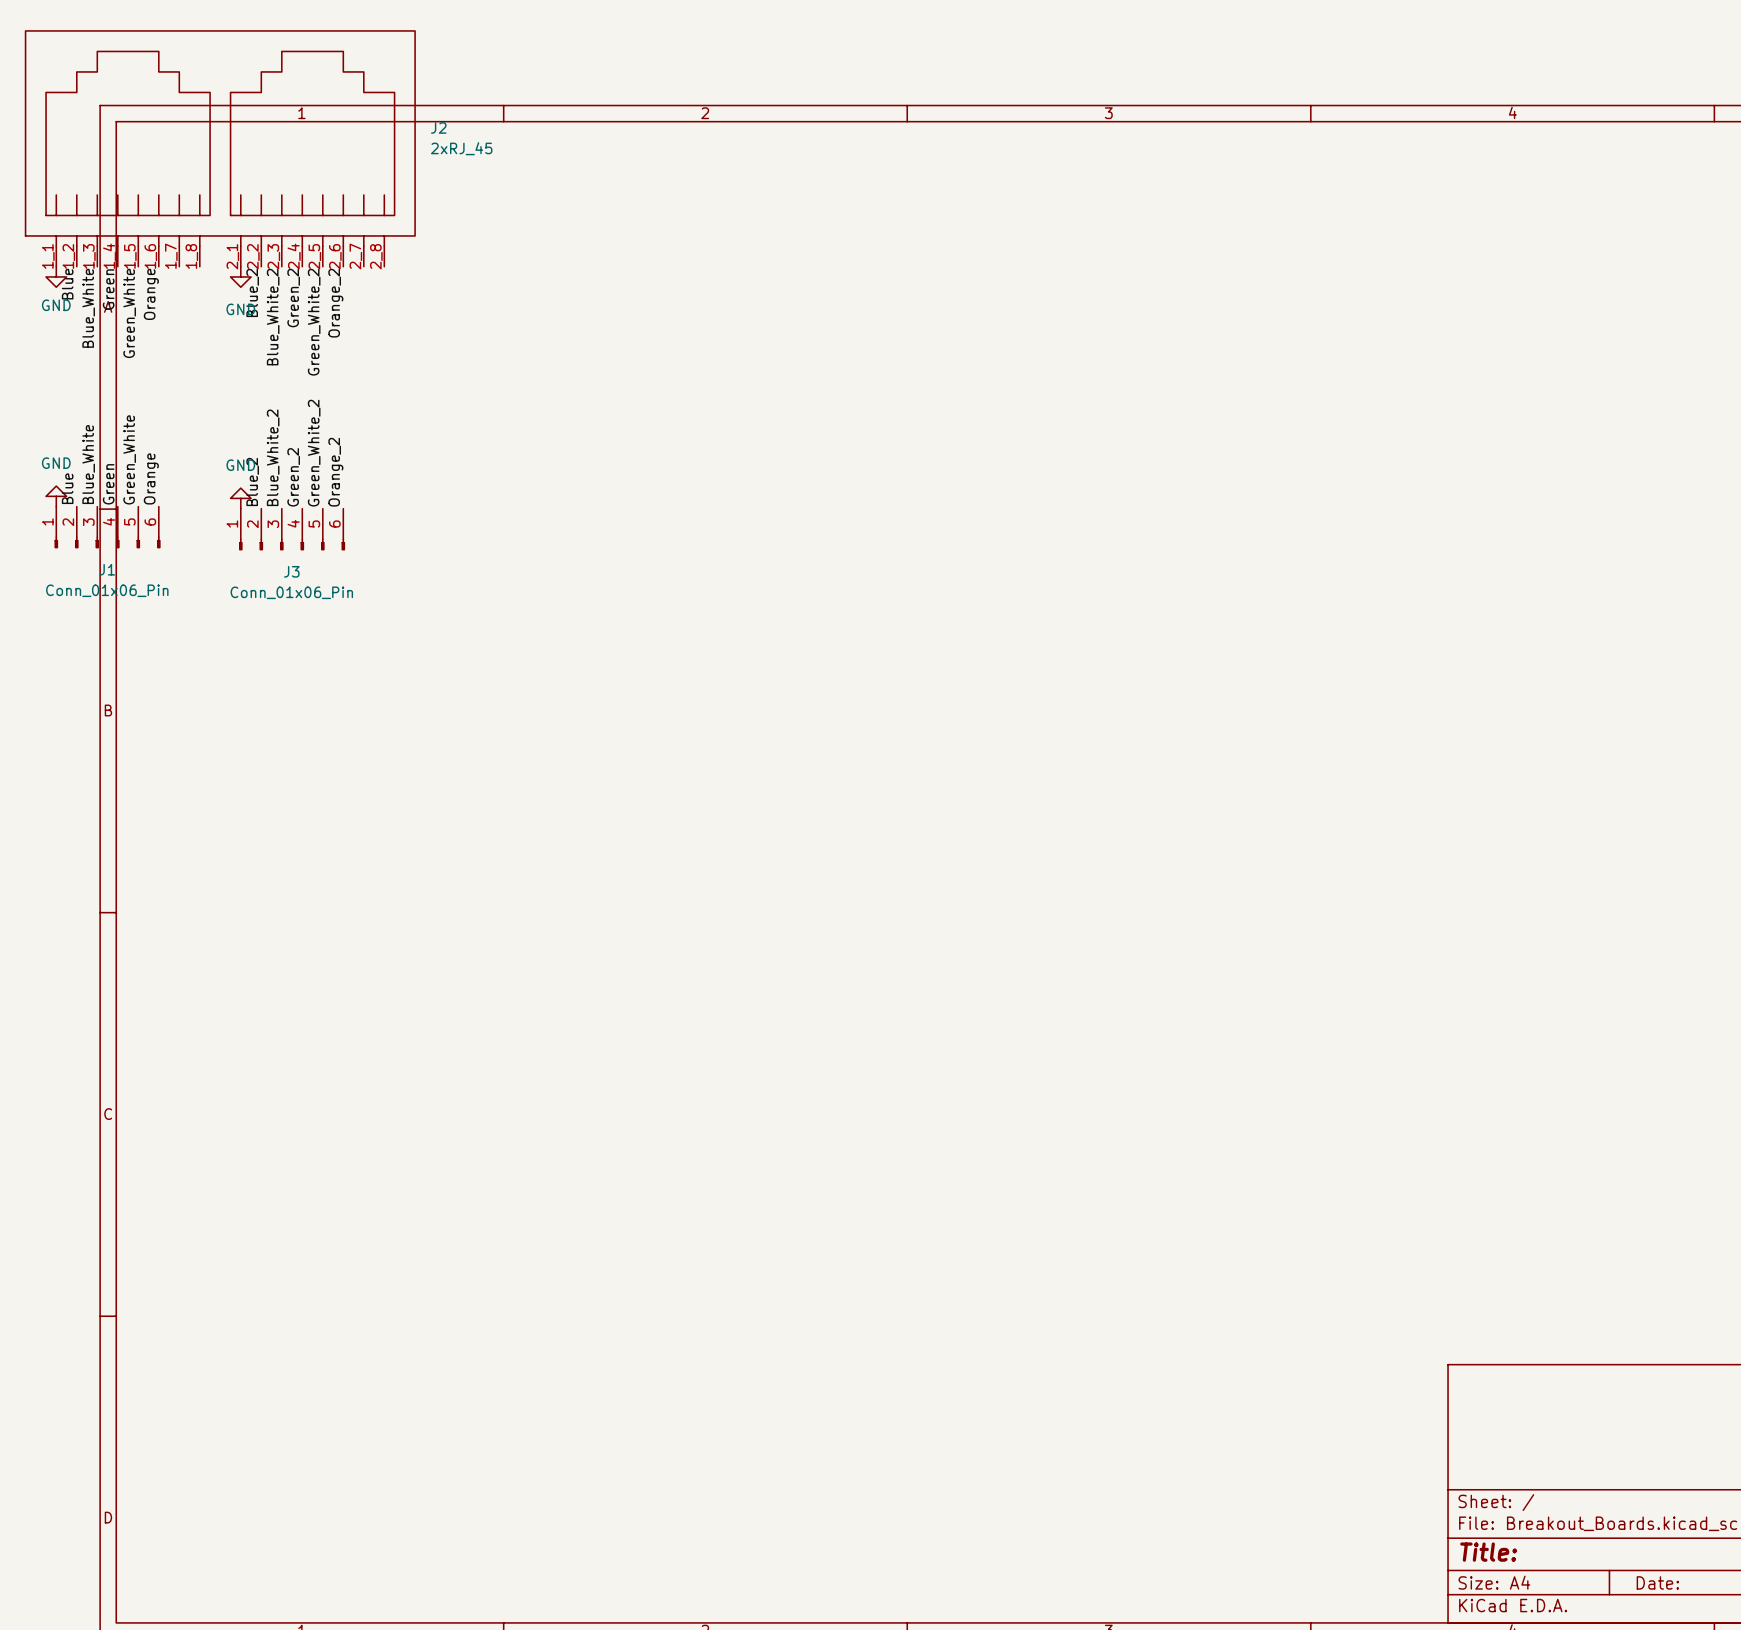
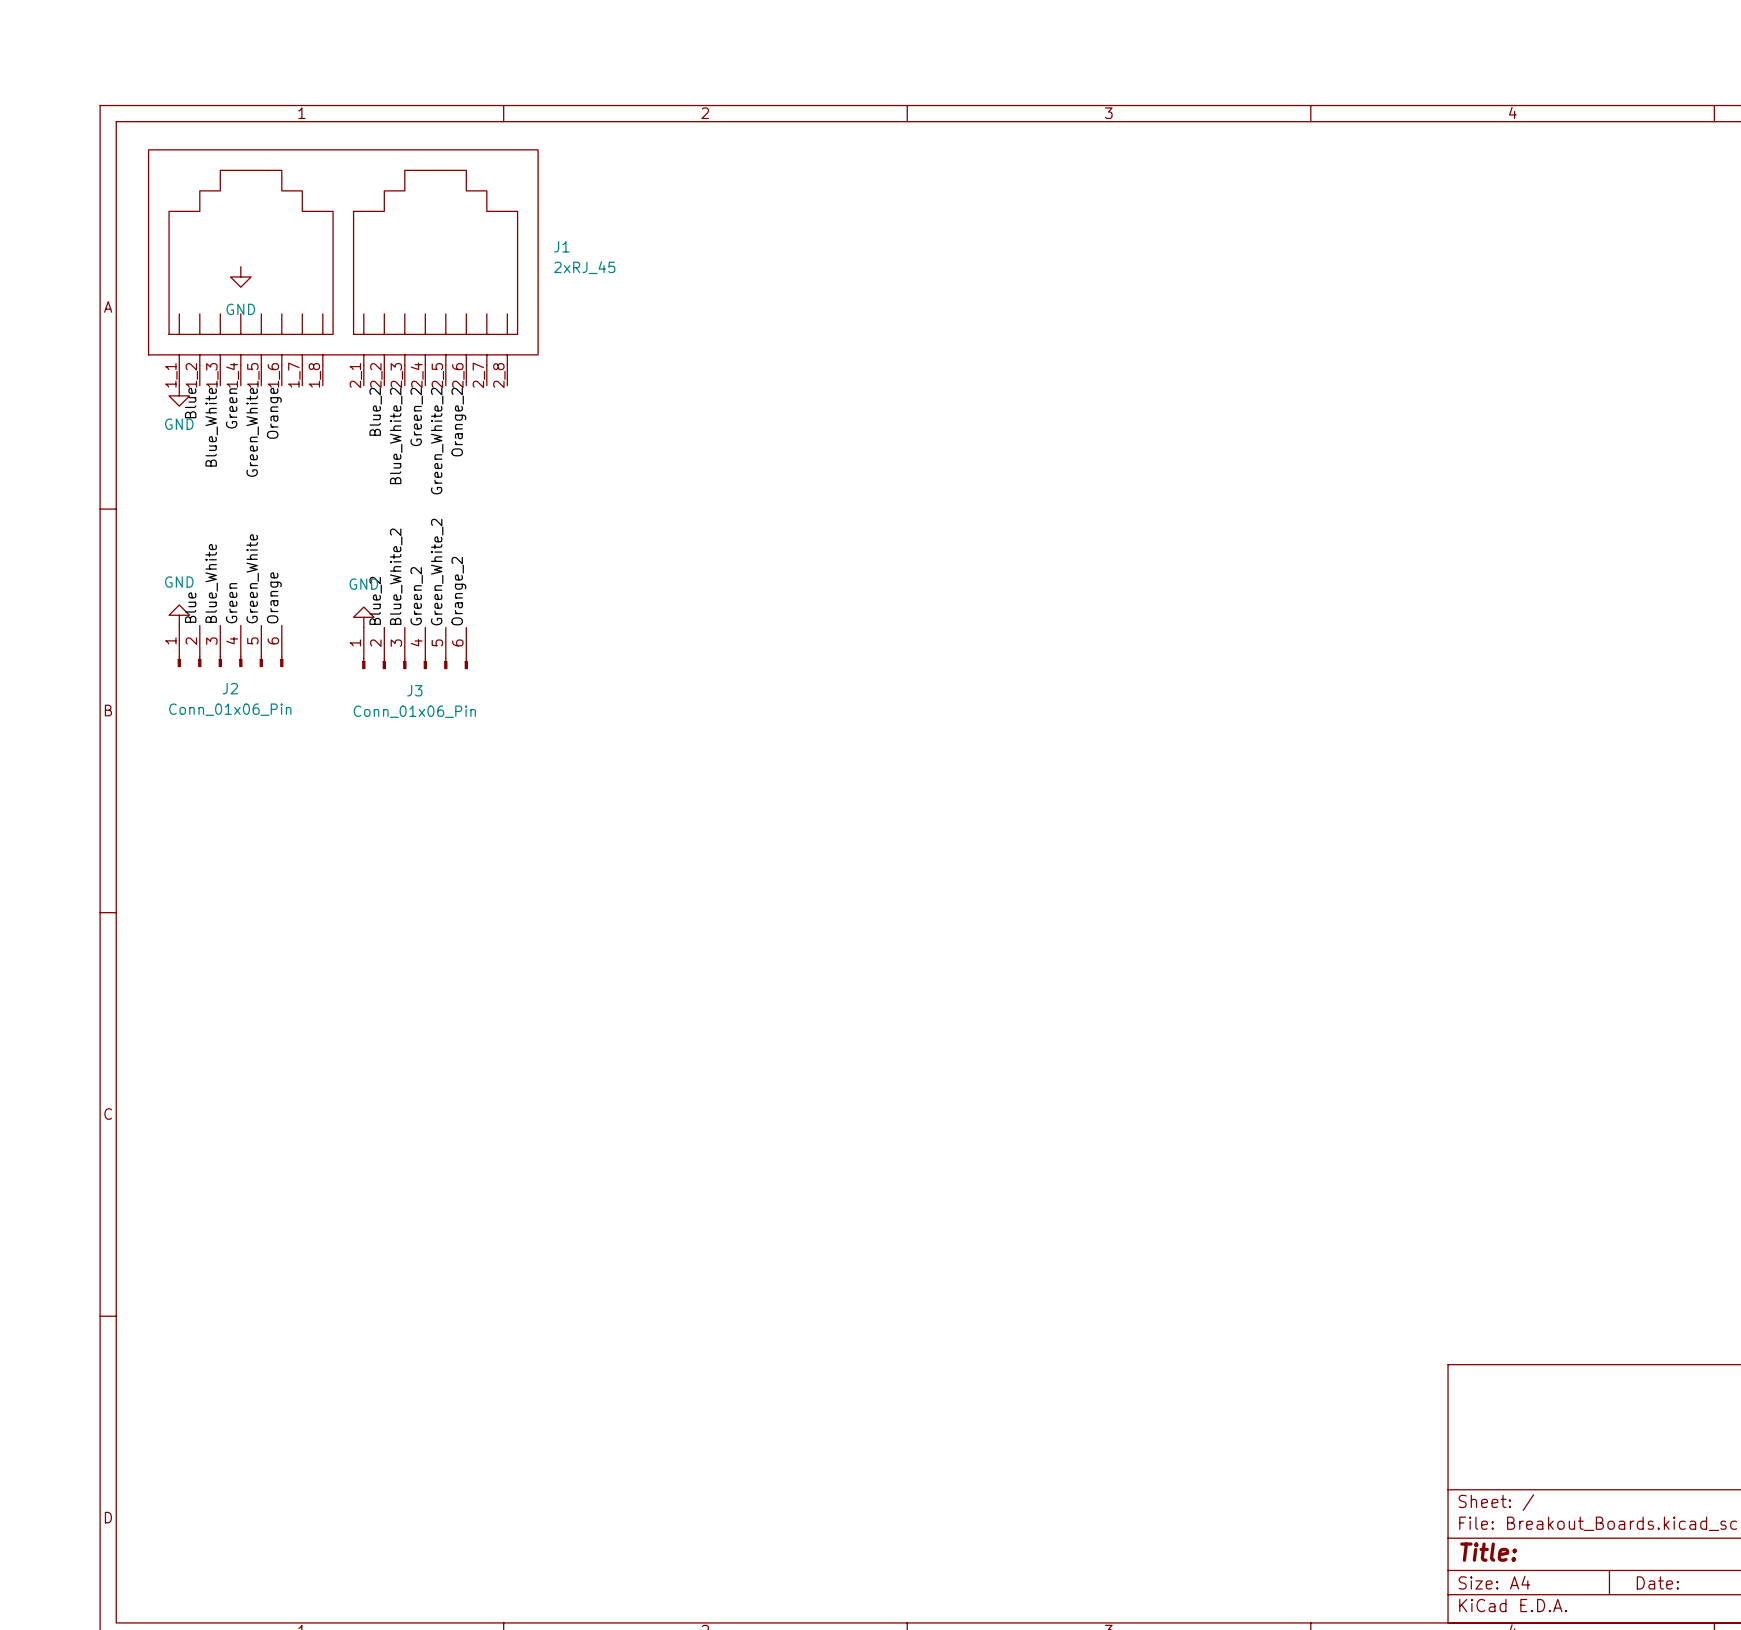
J2 symbol: [25, 30, 416, 267] -> [177, 625, 284, 668]
J2 name position: J2 (438, 127) -> J2 (230, 688)
J2 value: 2xRJ_45 (461, 148) -> Conn_01x06_Pin (230, 709)
power symbol: GND (56, 276) -> none
label: Blue (67, 284) -> none
label: Green (108, 289) -> none
label: Blue_2 (252, 292) -> none
label: Orange (151, 294) -> none
label: Green_2 (293, 298) -> none
label: Orange_2 (335, 303) -> none
label: Blue_White (88, 308) -> none
label: Green_White (129, 313) -> none
label: Blue_White_2 (273, 317) -> none
label: Green_White_2 (314, 322) -> none
power symbol: none -> GND (179, 395)
label: none -> Blue (190, 403)
label: none -> Green (231, 408)
label: none -> Blue_2 (375, 411)
label: none -> Orange (274, 413)
label: none -> Green_2 (416, 416)
label: none -> Orange_2 (458, 422)
label: none -> Blue_White (211, 427)
label: none -> Green_White (252, 432)
label: none -> Blue_White_2 (396, 435)
label: none -> Green_White_2 (437, 441)
label: Green_White_2 (314, 453) -> none
label: Blue_White_2 (273, 457) -> none
label: Green_White (129, 459) -> none
label: Blue_White (88, 464) -> none
label: Orange_2 (335, 472) -> none
label: Green_2 (293, 477) -> none
label: Orange (151, 478) -> none
label: Blue_2 (252, 481) -> none
label: Green (108, 484) -> none
label: Blue (67, 488) -> none
power symbol: GND (56, 496) -> none
power symbol: GND (240, 498) -> none
J1 symbol: [54, 506, 161, 549] -> [148, 149, 539, 386]
J3 position: (292, 529) -> (415, 648)
J1 name position: J1 (107, 569) -> J1 (561, 246)
label: none -> Green_White_2 (437, 572)
label: none -> Blue_White_2 (396, 576)
label: none -> Green_White (252, 578)
label: none -> Blue_White (211, 583)
J1 value: Conn_01x06_Pin (107, 590) -> 2xRJ_45 (584, 267)
label: none -> Orange_2 (458, 591)
label: none -> Green_2 (416, 596)
label: none -> Orange (274, 597)
label: none -> Blue_2 (375, 600)
label: none -> Green (231, 603)
label: none -> Blue (190, 607)
power symbol: none -> GND (179, 615)
power symbol: none -> GND (363, 617)

